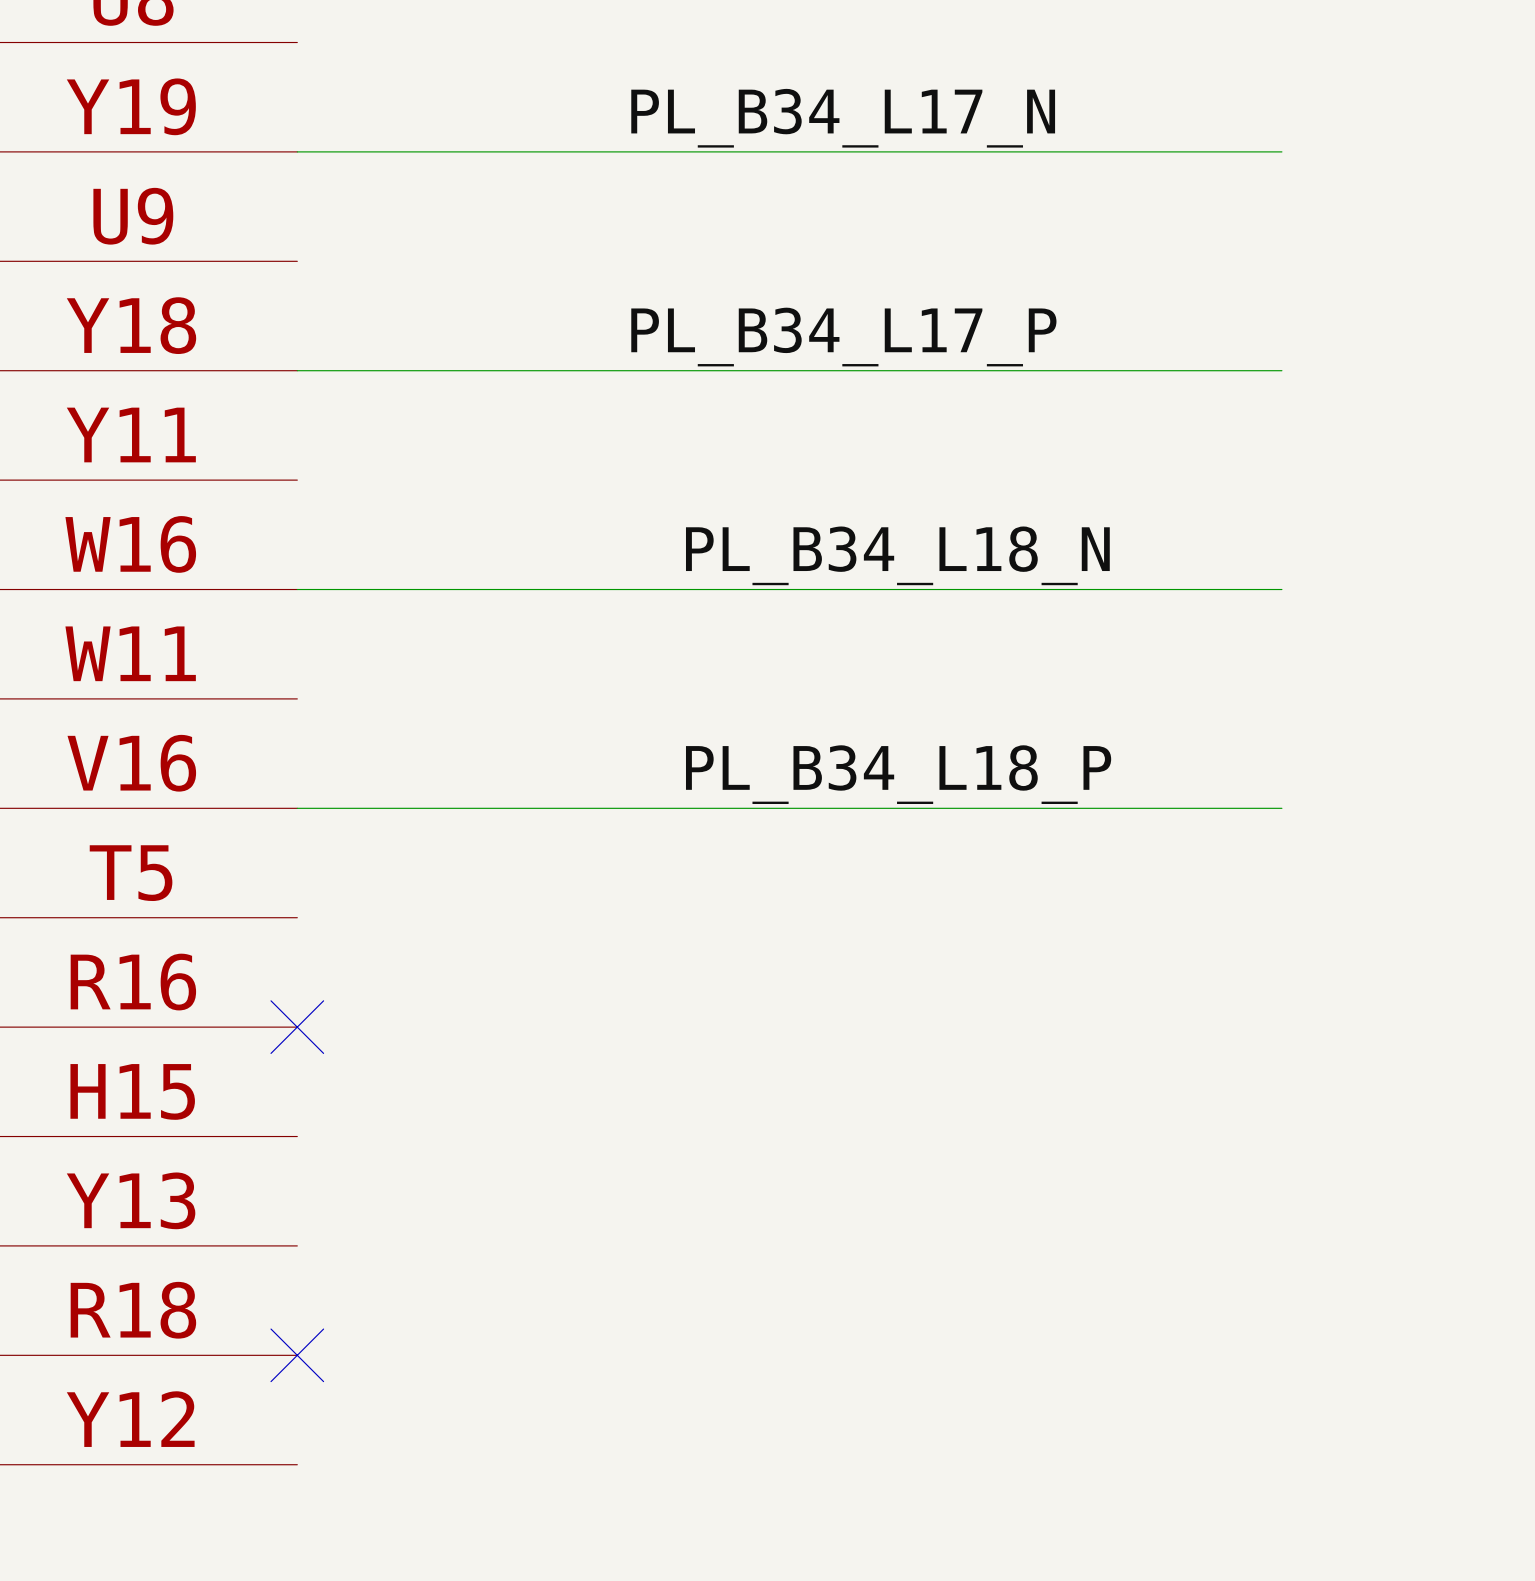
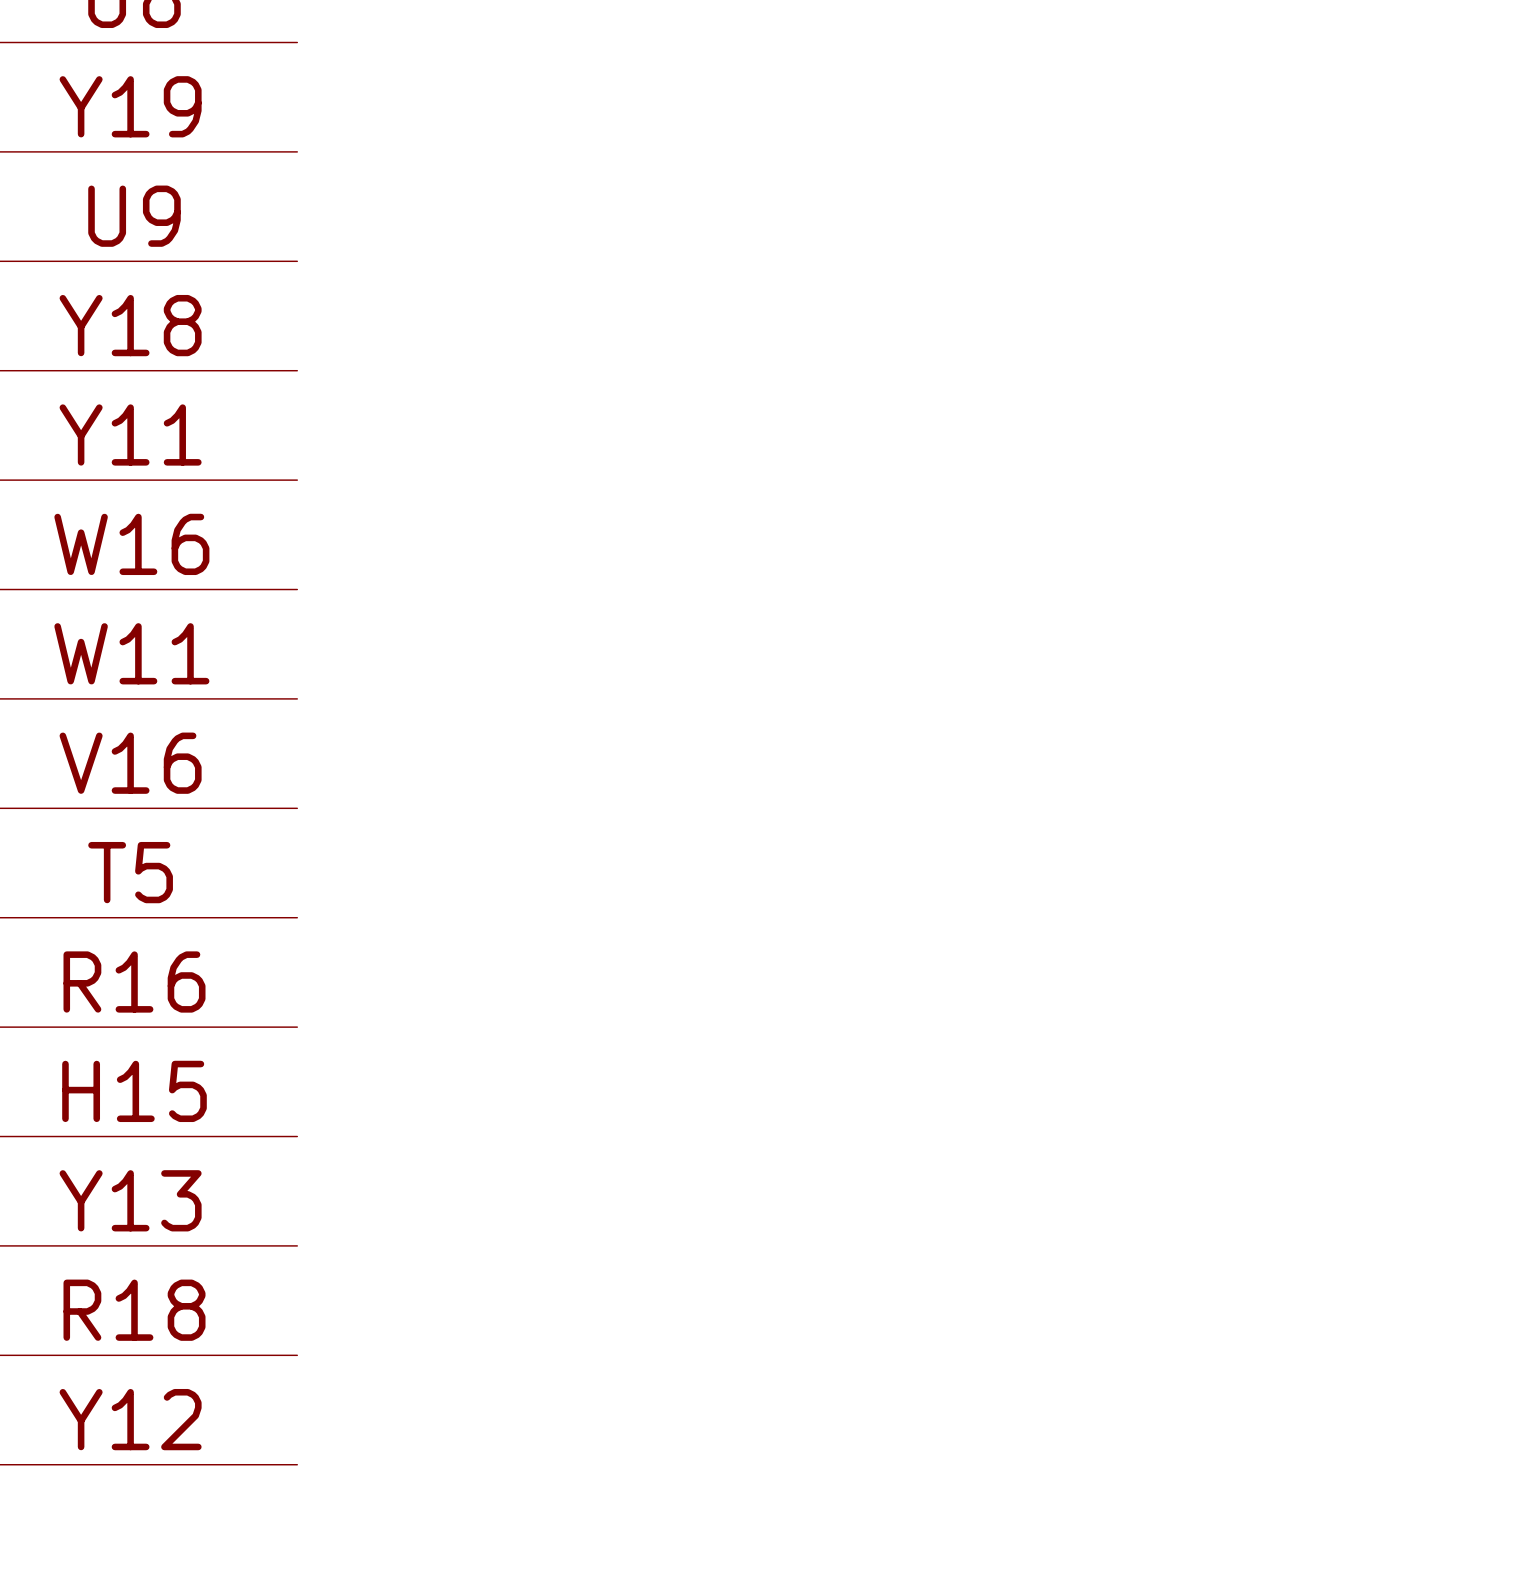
label: PL_B34_L17_N (843, 118) -> none
wire: (297, 151) (1281, 151) -> none
label: PL_B34_L17_P (843, 337) -> none
wire: (297, 370) (1281, 370) -> none
label: PL_B34_L18_N (897, 555) -> none
wire: (297, 589) (1281, 589) -> none
label: PL_B34_L18_P (898, 774) -> none
wire: (297, 808) (1281, 808) -> none
no-connect mark: (297, 1027) -> none
no-connect mark: (297, 1355) -> none

